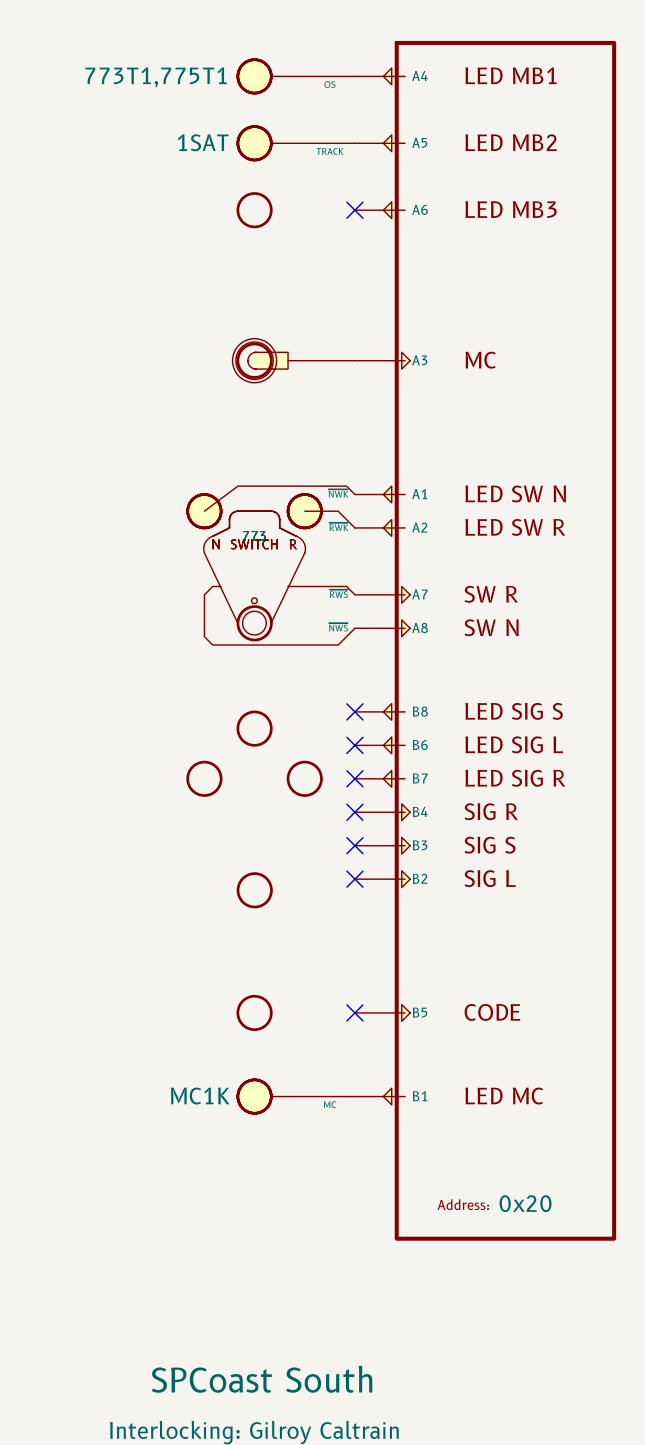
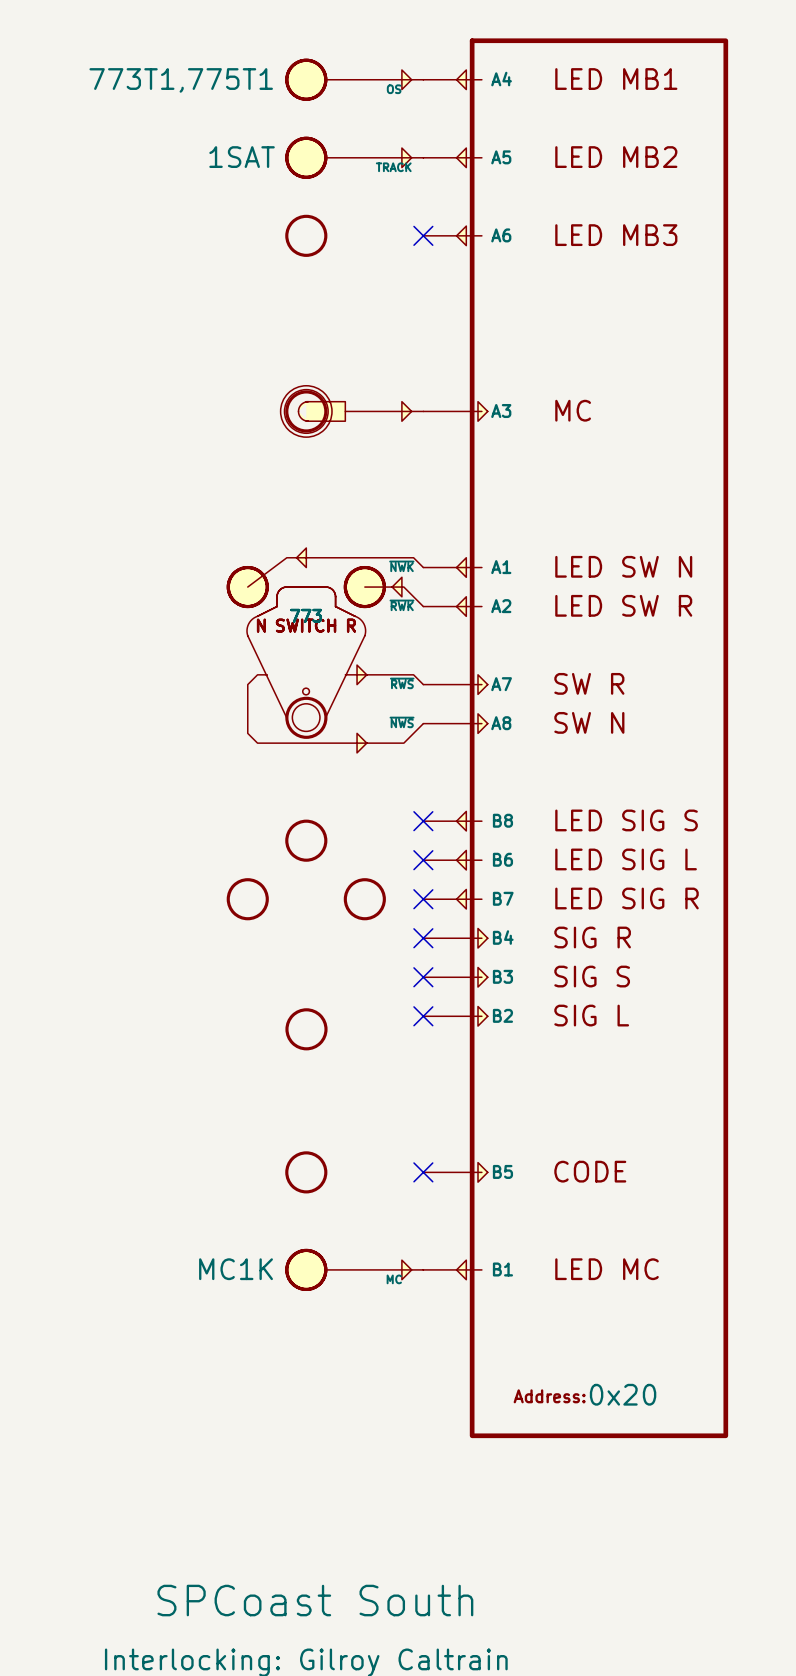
part symbol: [236, 58, 355, 95] -> [285, 58, 424, 101]
part symbol: [236, 125, 355, 162] -> [285, 136, 424, 179]
part symbol: [232, 338, 355, 383] -> [280, 385, 424, 438]
part symbol: [186, 486, 355, 537] -> [226, 548, 424, 617]
part symbol: [203, 511, 355, 646] -> [247, 587, 424, 753]
part symbol: [236, 1078, 355, 1115] -> [285, 1248, 424, 1292]

